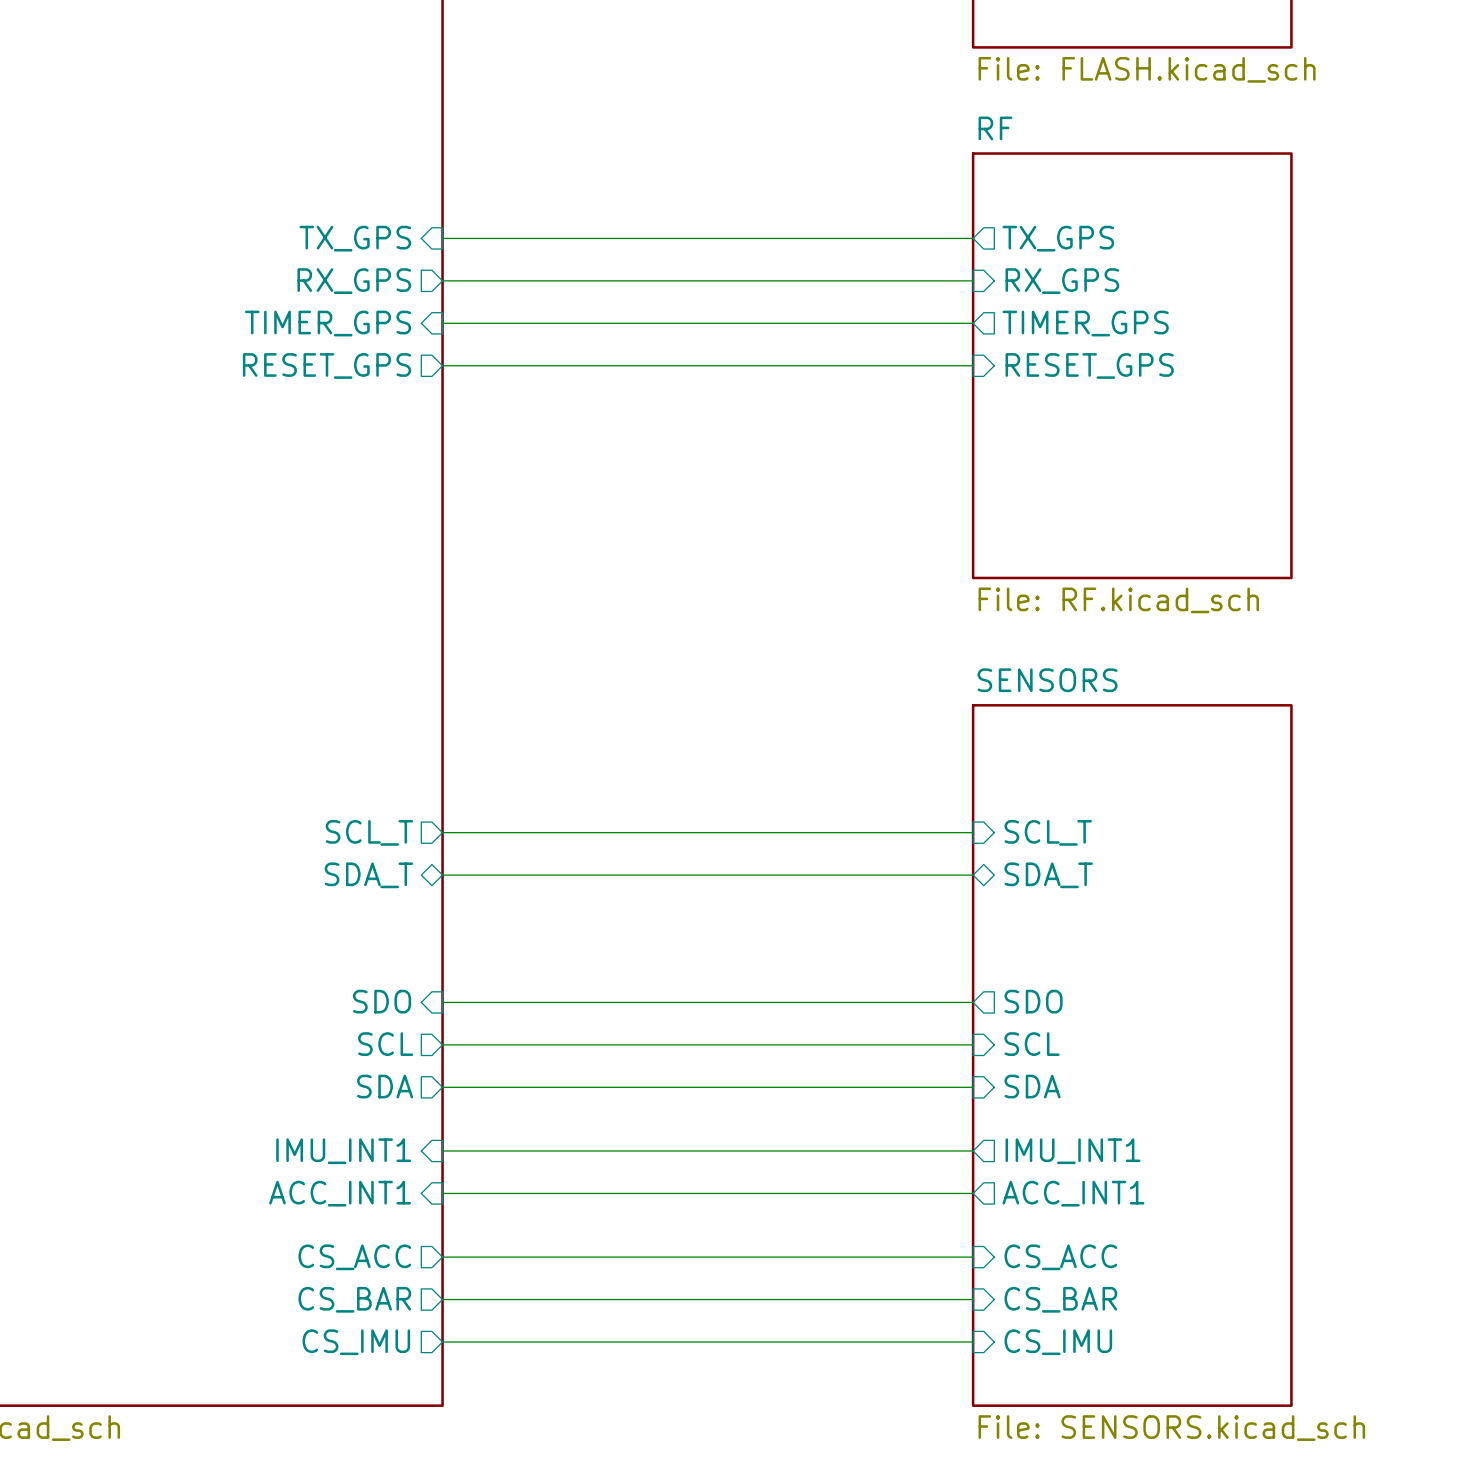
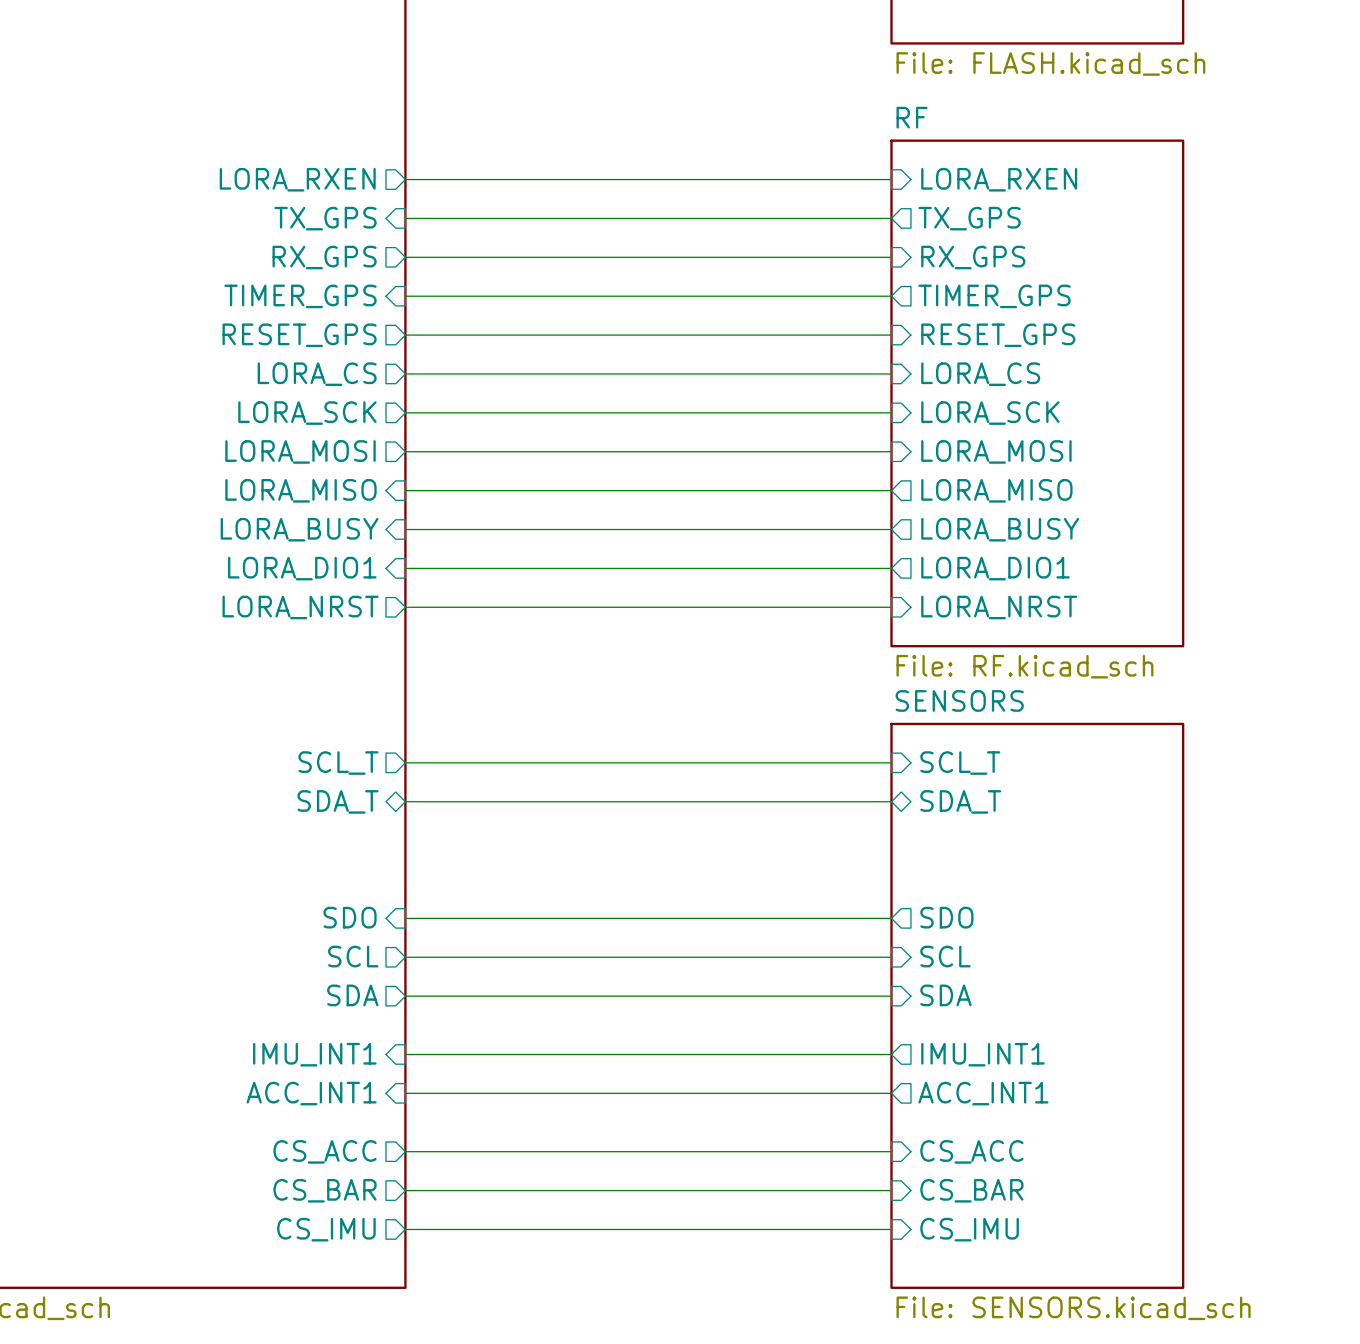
wire: none -> (405, 179) (891, 179)
sheet pin: none -> LORA_RXEN (297, 179)
sheet pin: none -> LORA_RXEN (999, 179)
sheet RF: File: RF.kicad_sch (1132, 365) -> none
sheet pin: none -> LORA_CS (317, 374)
wire: none -> (405, 373) (891, 373)
sheet pin: none -> LORA_CS (980, 374)
sheet RF: none -> File: RF.kicad_sch (1037, 393)
sheet pin: none -> LORA_SCK (307, 413)
wire: none -> (405, 412) (891, 412)
sheet pin: none -> LORA_SCK (990, 413)
sheet pin: none -> LORA_MOSI (300, 451)
wire: none -> (405, 451) (891, 451)
sheet pin: none -> LORA_MOSI (996, 451)
sheet pin: none -> LORA_MISO (300, 490)
wire: none -> (405, 490) (891, 490)
sheet pin: none -> LORA_MISO (996, 490)
wire: none -> (405, 529) (891, 529)
sheet pin: none -> LORA_BUSY (299, 529)
sheet pin: none -> LORA_BUSY (1000, 529)
sheet pin: none -> LORA_DIO1 (302, 568)
wire: none -> (405, 568) (891, 568)
sheet pin: none -> LORA_DIO1 (995, 568)
wire: none -> (405, 607) (891, 607)
sheet pin: none -> LORA_NRST (300, 607)
sheet pin: none -> LORA_NRST (999, 607)
sheet SENSORS: File: SENSORS.kicad_sch (1132, 1055) -> none
sheet SENSORS: none -> File: SENSORS.kicad_sch (1037, 1005)

